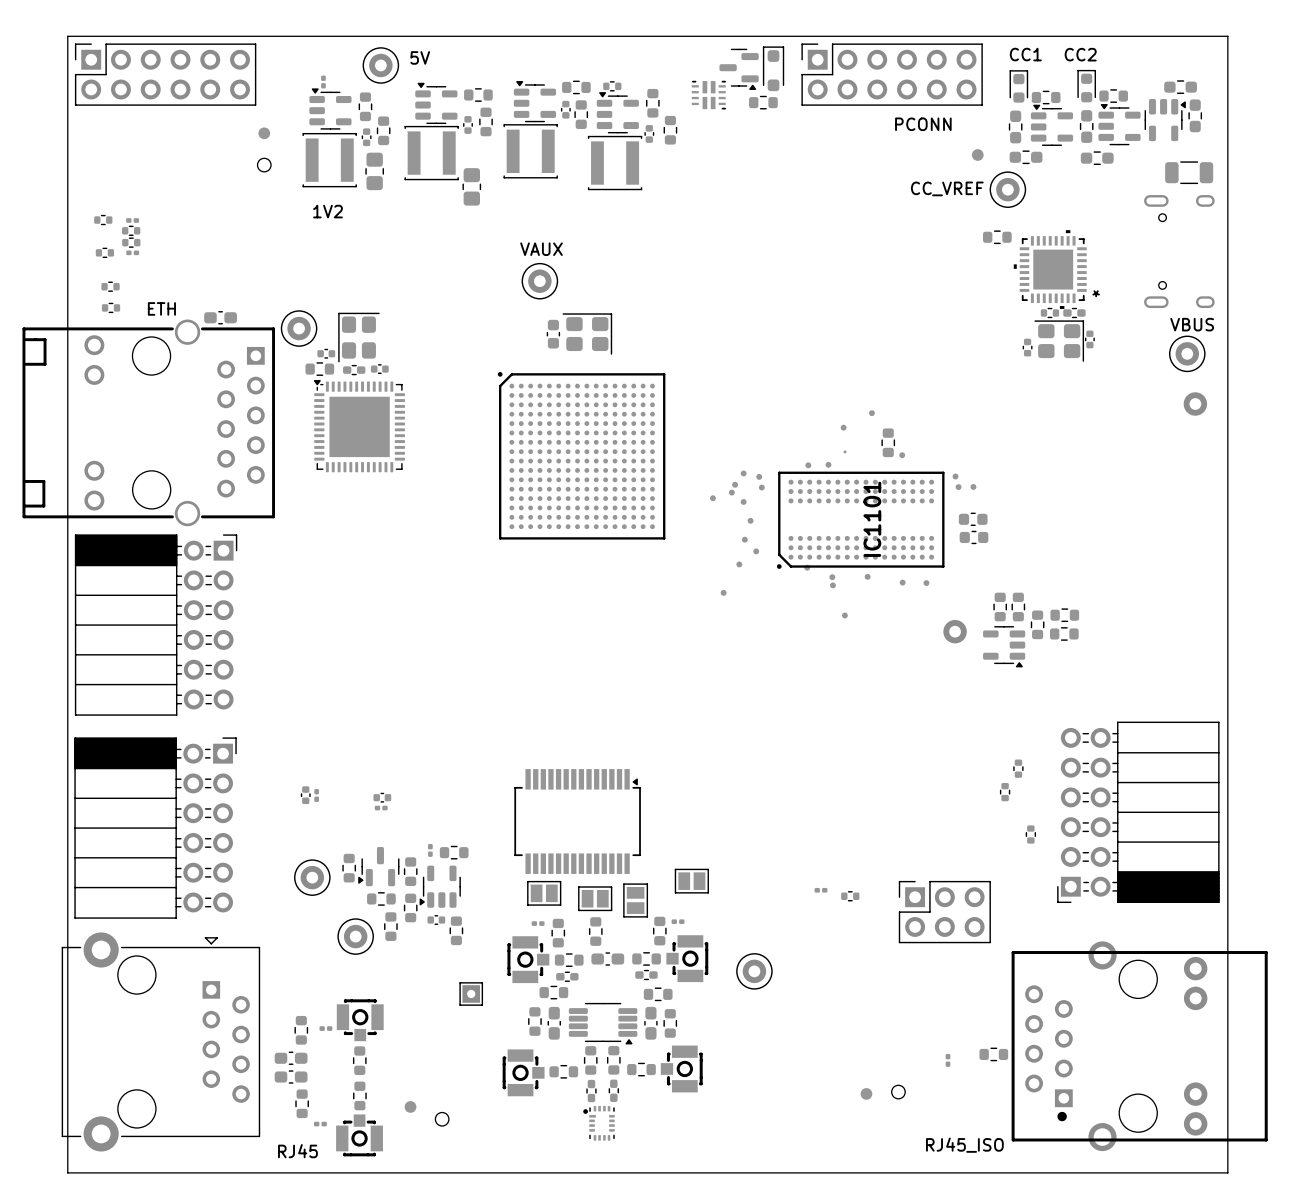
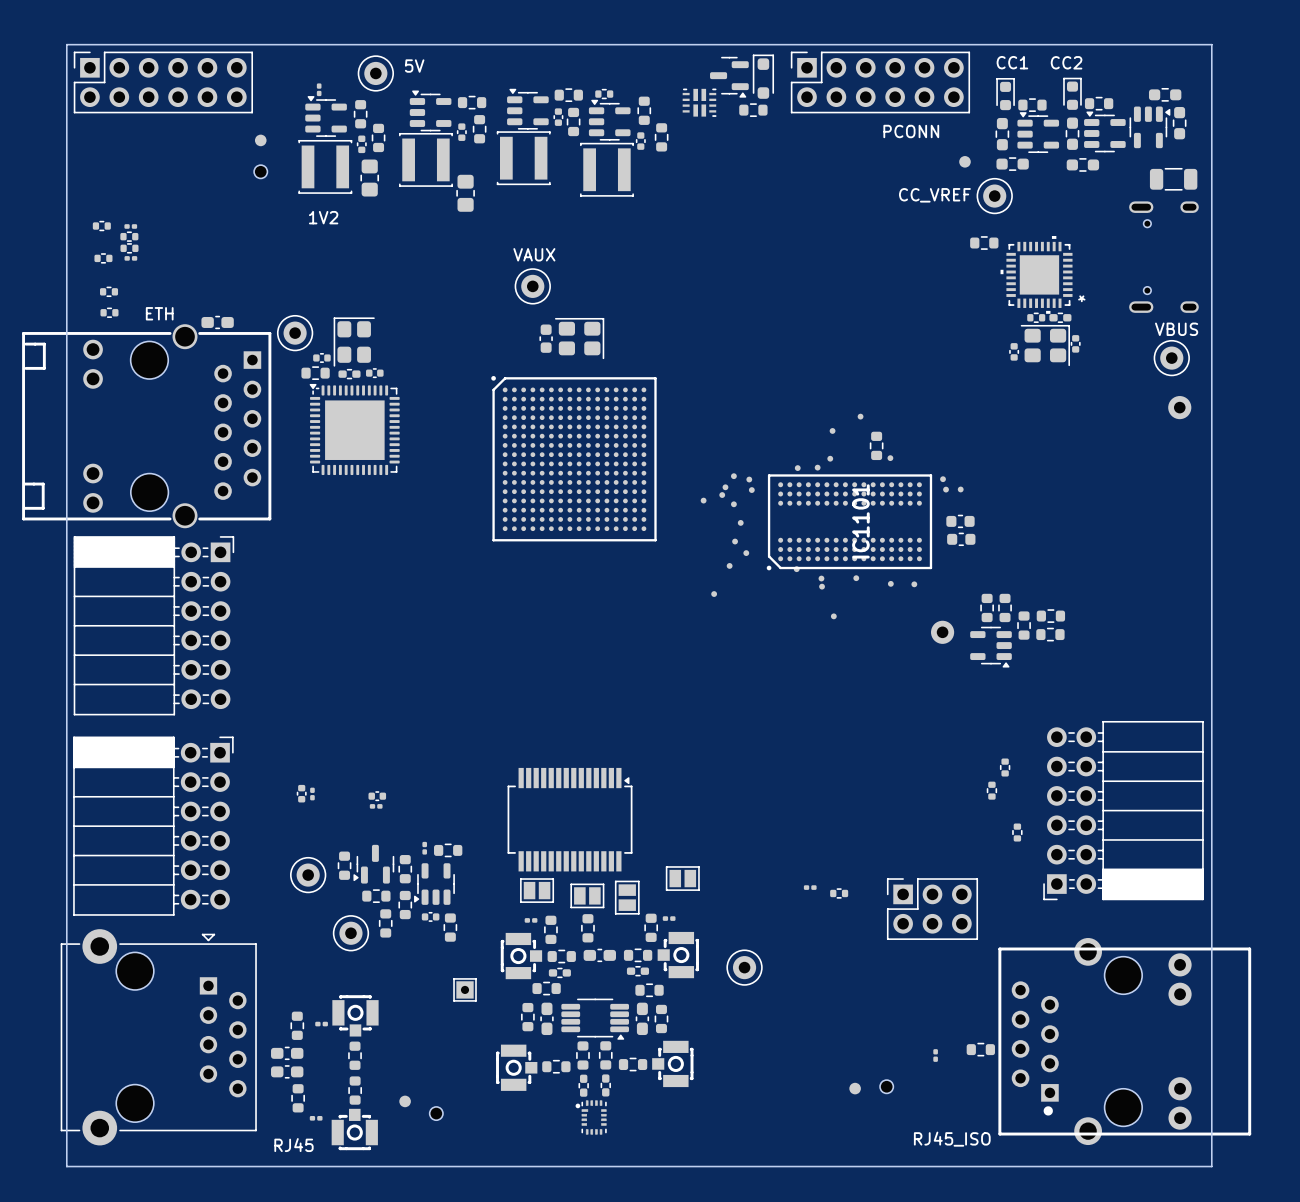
part footprint: [843, 450, 847, 454] -> [827, 455, 834, 462]

